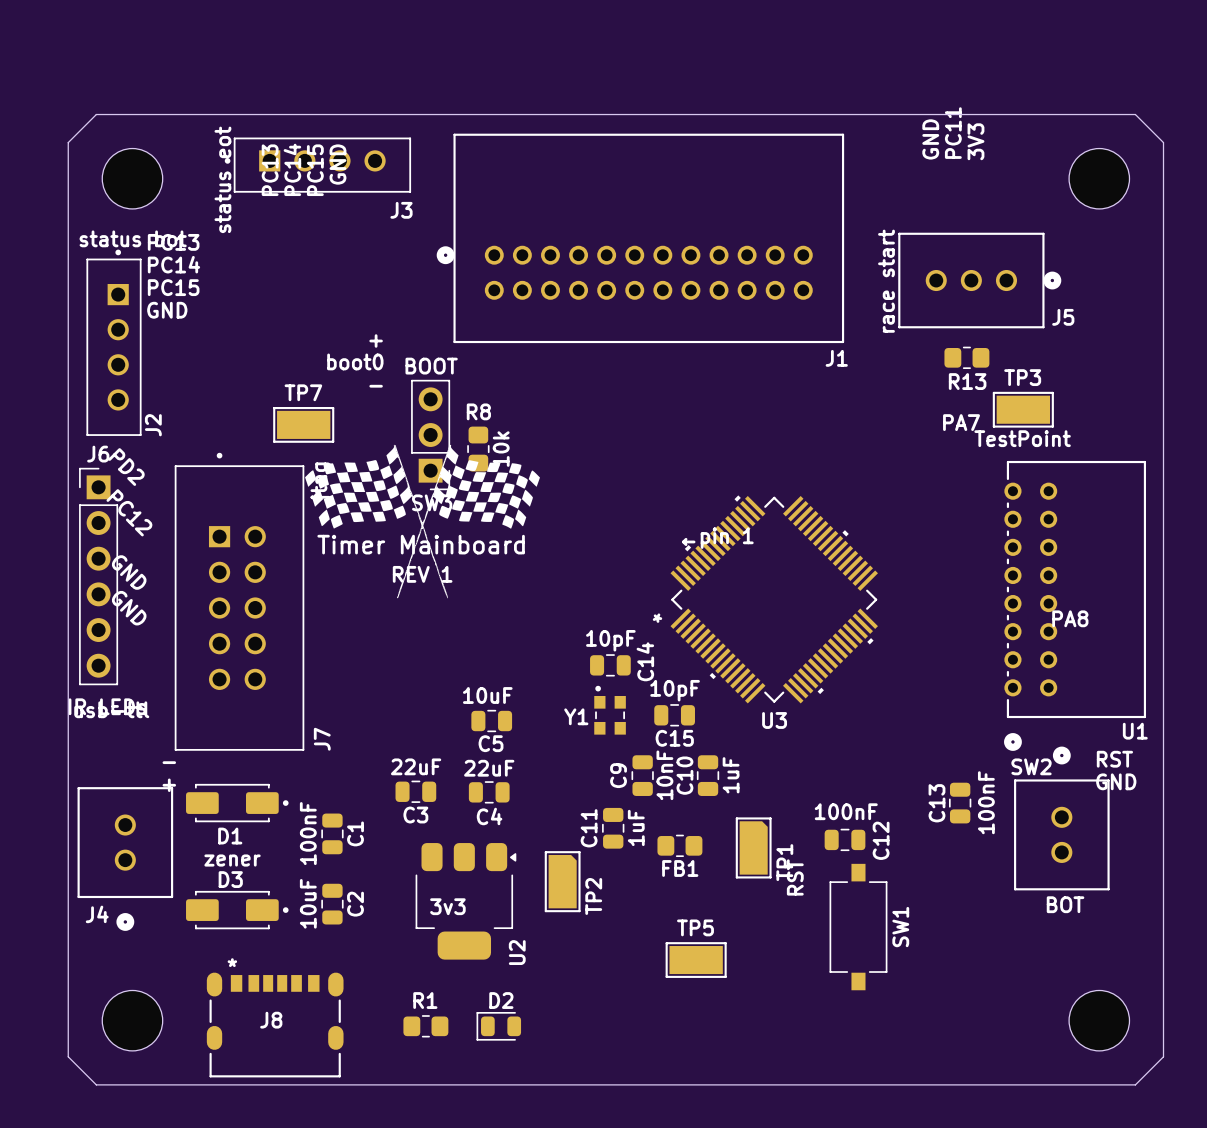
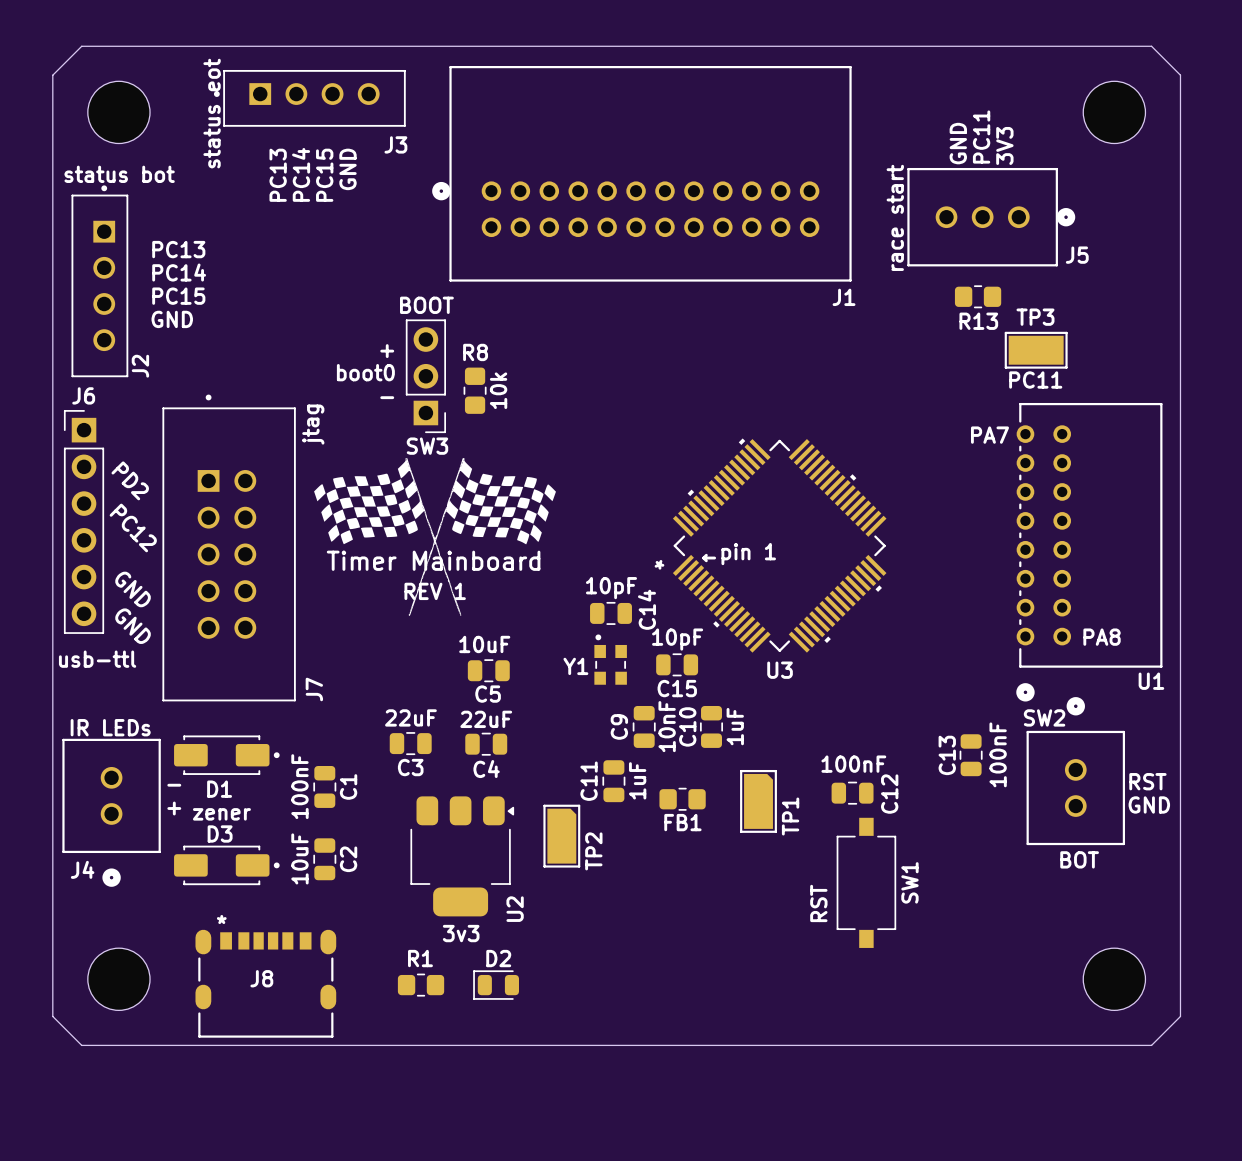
board edge: (96, 114) (1135, 114) (1163, 142) (1163, 1056) (1135, 1084) (96, 1084) (68, 1056) (68, 142) (96, 114) -> (81, 46) (1151, 46) (1180, 75) (1180, 1016) (1151, 1045) (81, 1045) (52, 1016) (52, 75) (81, 46)
J3 position: (317, 165) -> (309, 98)
part position: (132, 178) -> (118, 112)
part position: (1099, 178) -> (1114, 112)
J1 position: (640, 238) -> (641, 173)
J5 position: (979, 280) -> (991, 217)
J2 position: (113, 342) -> (99, 281)
R13 position: (966, 357) -> (978, 296)
TP3 position: (1023, 409) -> (1036, 350)
TP7: (303, 424) -> none
SW3 position: (430, 435) -> (425, 376)
TP3 value: TestPoint (1022, 438) -> PC11 (1035, 380)
R8 position: (478, 449) -> (475, 390)
J6 position: (98, 576) -> (84, 521)
U3 position: (774, 599) -> (779, 545)
J7 position: (239, 601) -> (229, 547)
U1 position: (1075, 605) -> (1089, 552)
C14 position: (610, 665) -> (611, 613)
Y1 position: (610, 710) -> (610, 659)
C15 position: (674, 715) -> (677, 664)
C5 position: (491, 721) -> (488, 670)
C9 position: (642, 775) -> (644, 726)
C10 position: (708, 775) -> (711, 726)
C3 position: (415, 791) -> (410, 743)
C4 position: (489, 792) -> (486, 744)
D1 position: (237, 803) -> (226, 755)
C13 position: (960, 803) -> (971, 755)
SW2 position: (1061, 818) -> (1075, 771)
C11 position: (613, 828) -> (613, 781)
C1 position: (332, 833) -> (324, 786)
C12 position: (845, 839) -> (852, 793)
FB1 position: (679, 845) -> (682, 799)
TP1 position: (753, 847) -> (758, 801)
J4 position: (125, 858) -> (111, 812)
TP2 position: (562, 881) -> (561, 836)
U2 position: (465, 901) -> (462, 856)
C2 position: (332, 904) -> (324, 859)
D3 position: (237, 910) -> (226, 865)
SW1 position: (858, 927) -> (866, 882)
TP5: (696, 960) -> none
part position: (132, 1020) -> (118, 979)
part position: (1099, 1020) -> (1114, 979)
J8 position: (275, 1025) -> (265, 983)
R1 position: (425, 1026) -> (421, 985)
D2 position: (498, 1026) -> (496, 985)

